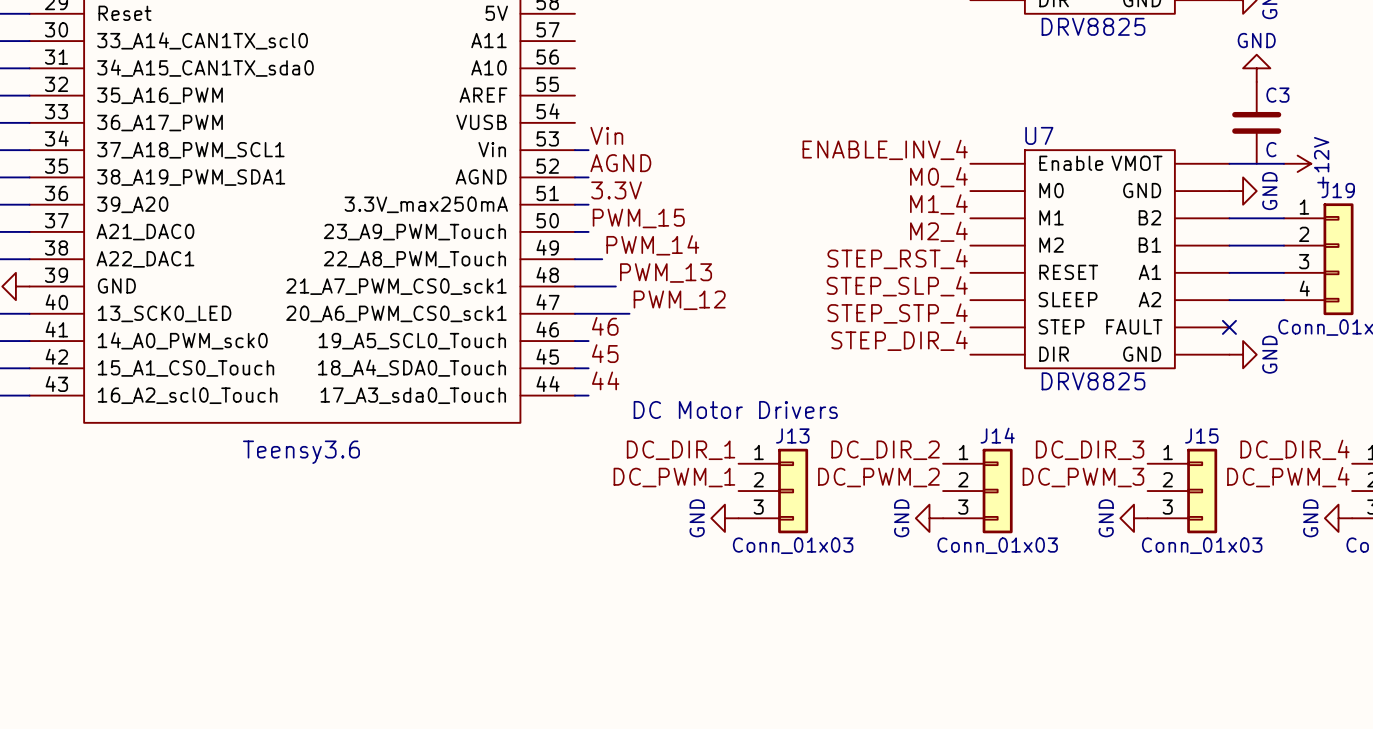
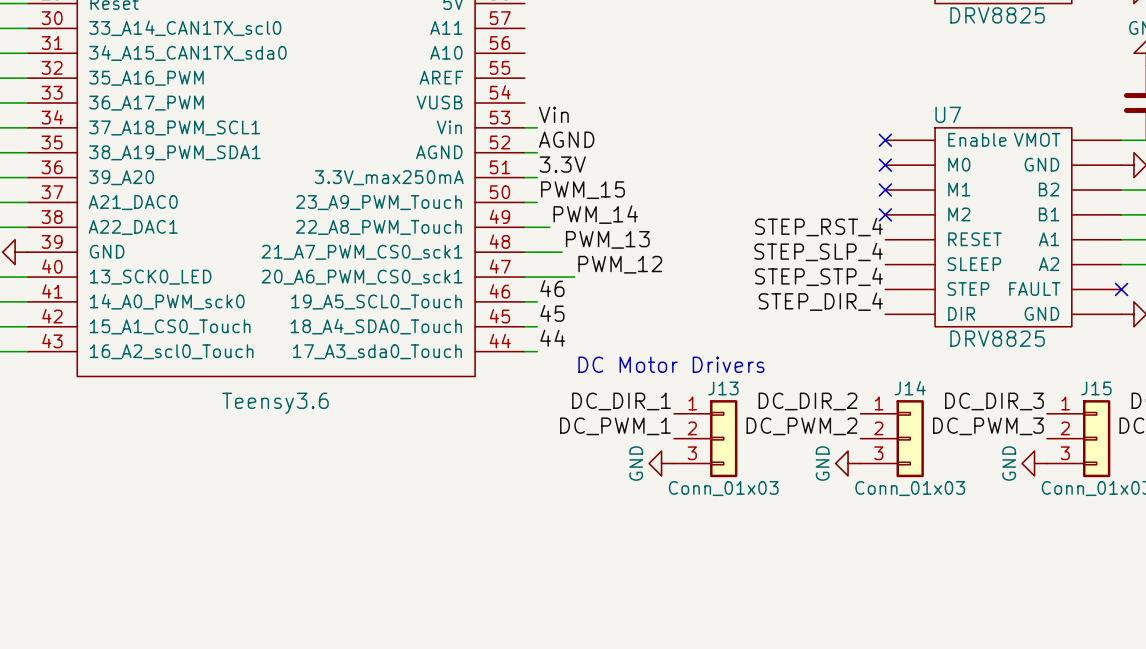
label: ENABLE_INV_4 (885, 149) -> none
no-connect mark: none -> (885, 140)
label: M0_4 (938, 177) -> none
no-connect mark: none -> (885, 165)
label: M1_4 (938, 204) -> none
no-connect mark: none -> (885, 190)
label: M2_4 (938, 231) -> none
no-connect mark: none -> (885, 214)

